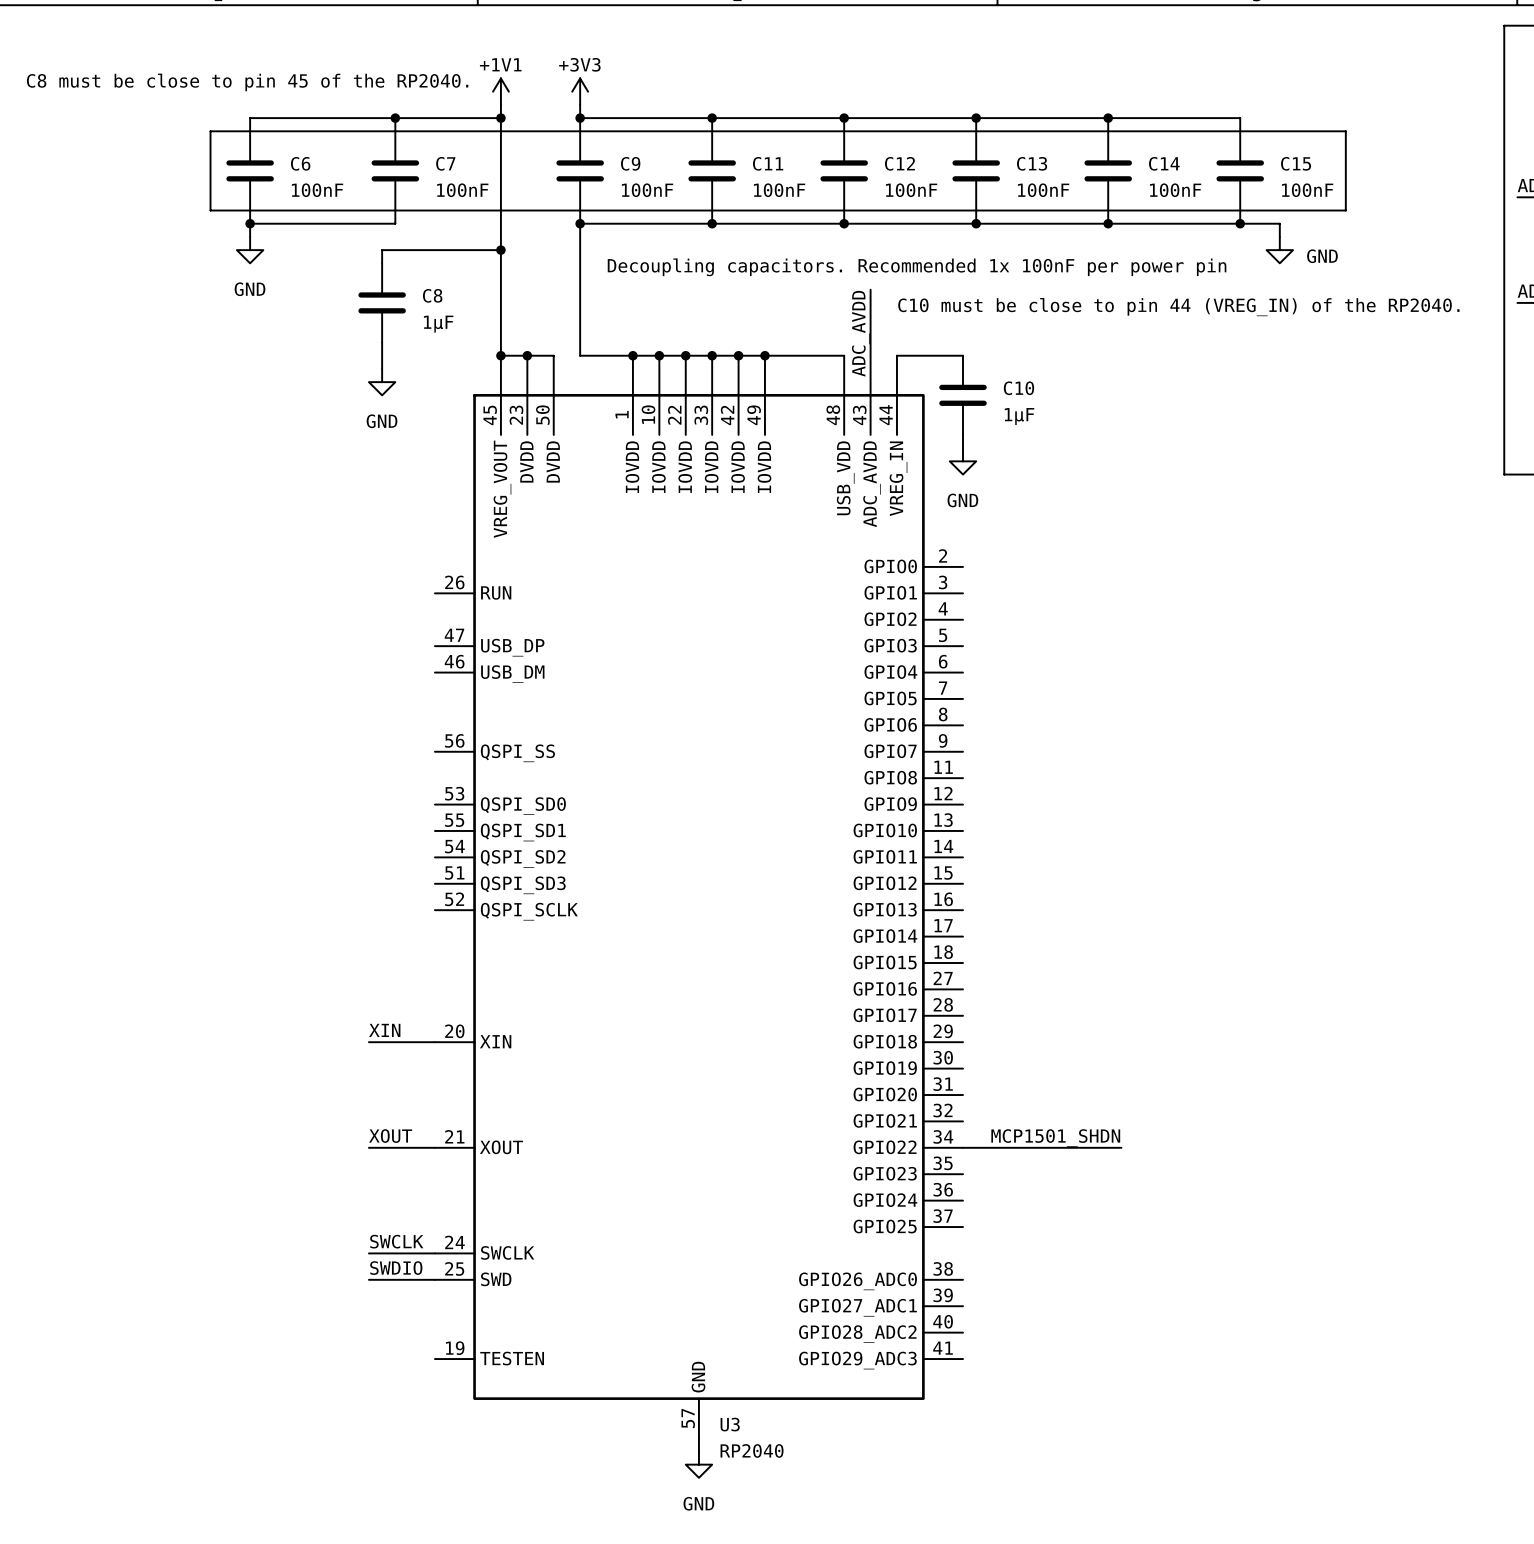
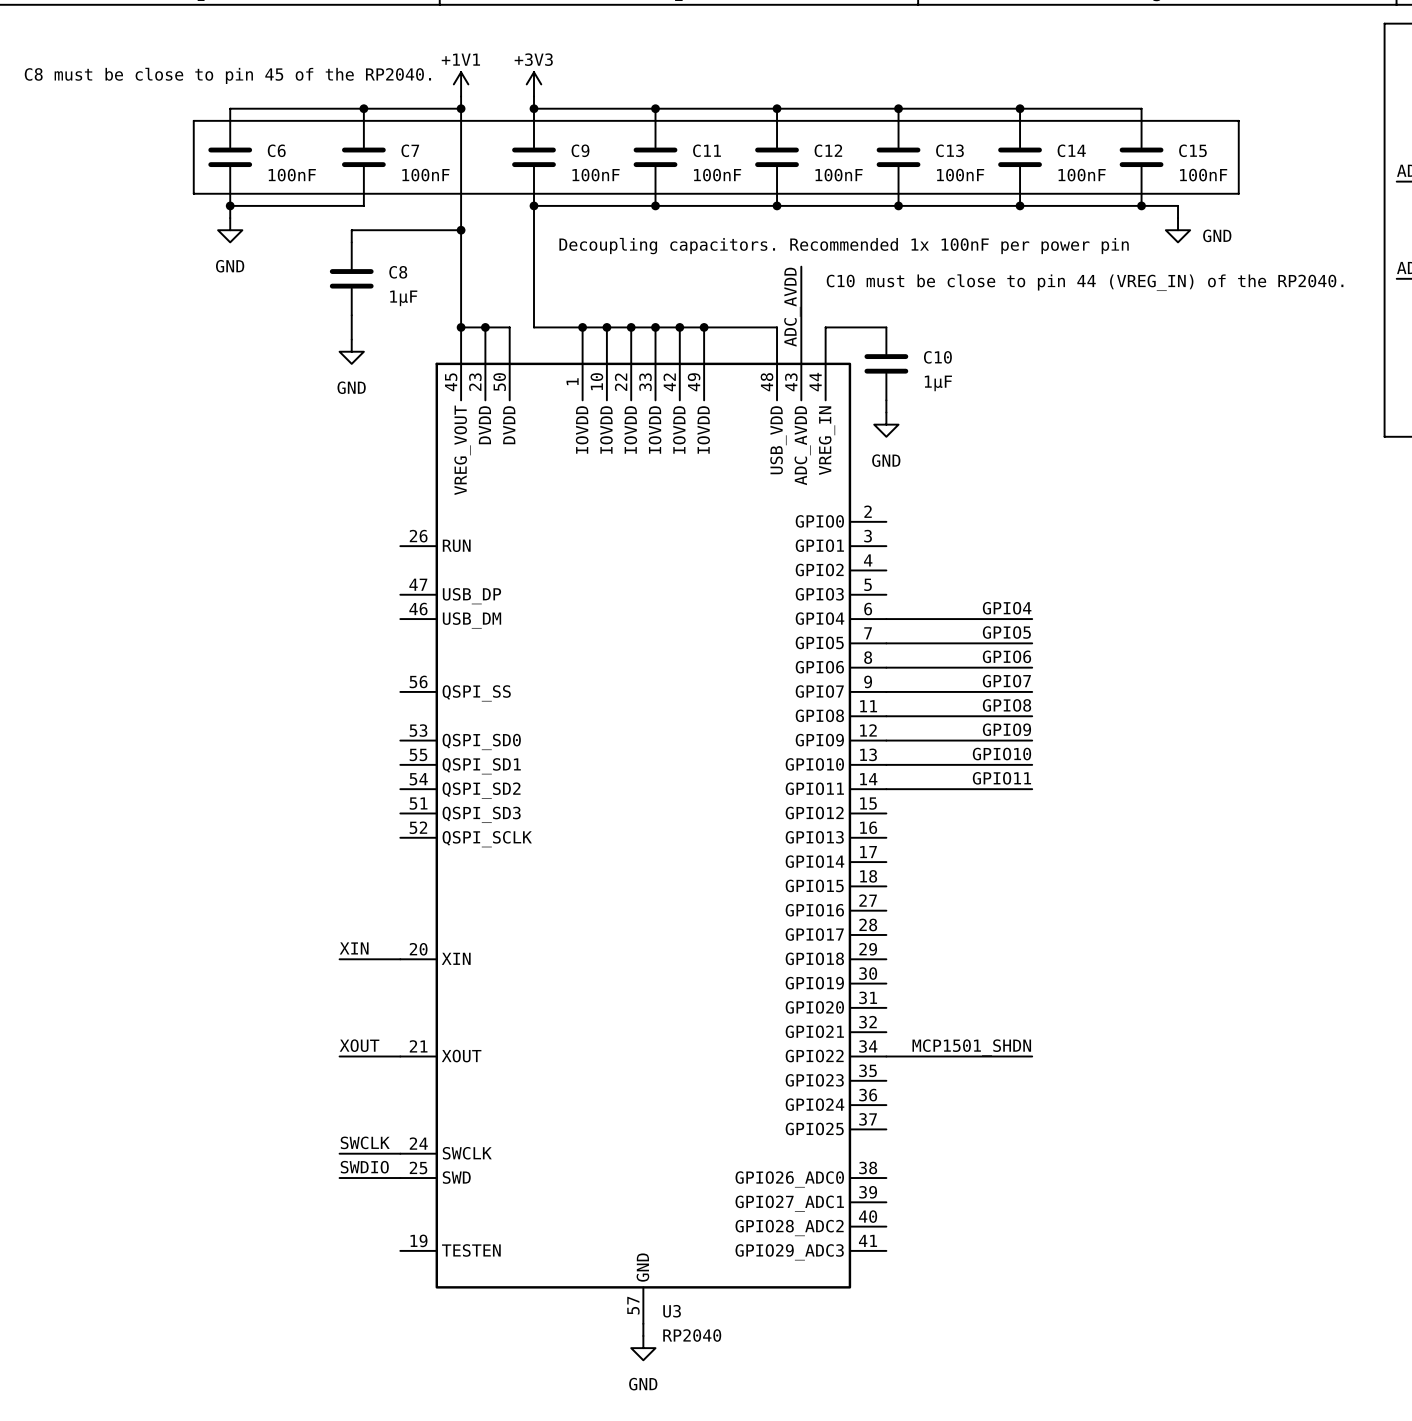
label: none -> GPIO4 (1007, 608)
wire: none -> (886, 619) (1032, 619)
label: none -> GPIO5 (1006, 632)
wire: none -> (886, 643) (1032, 643)
label: none -> GPIO6 (1006, 656)
wire: none -> (886, 667) (1032, 667)
label: none -> GPIO7 (1006, 681)
wire: none -> (886, 691) (1032, 691)
label: none -> GPIO8 (1006, 705)
wire: none -> (886, 716) (1032, 716)
label: none -> GPIO9 (1006, 729)
wire: none -> (886, 740) (1032, 740)
label: none -> GPIO10 (1001, 754)
wire: none -> (886, 764) (1032, 764)
label: none -> GPIO11 (1001, 778)
wire: none -> (886, 789) (1032, 789)

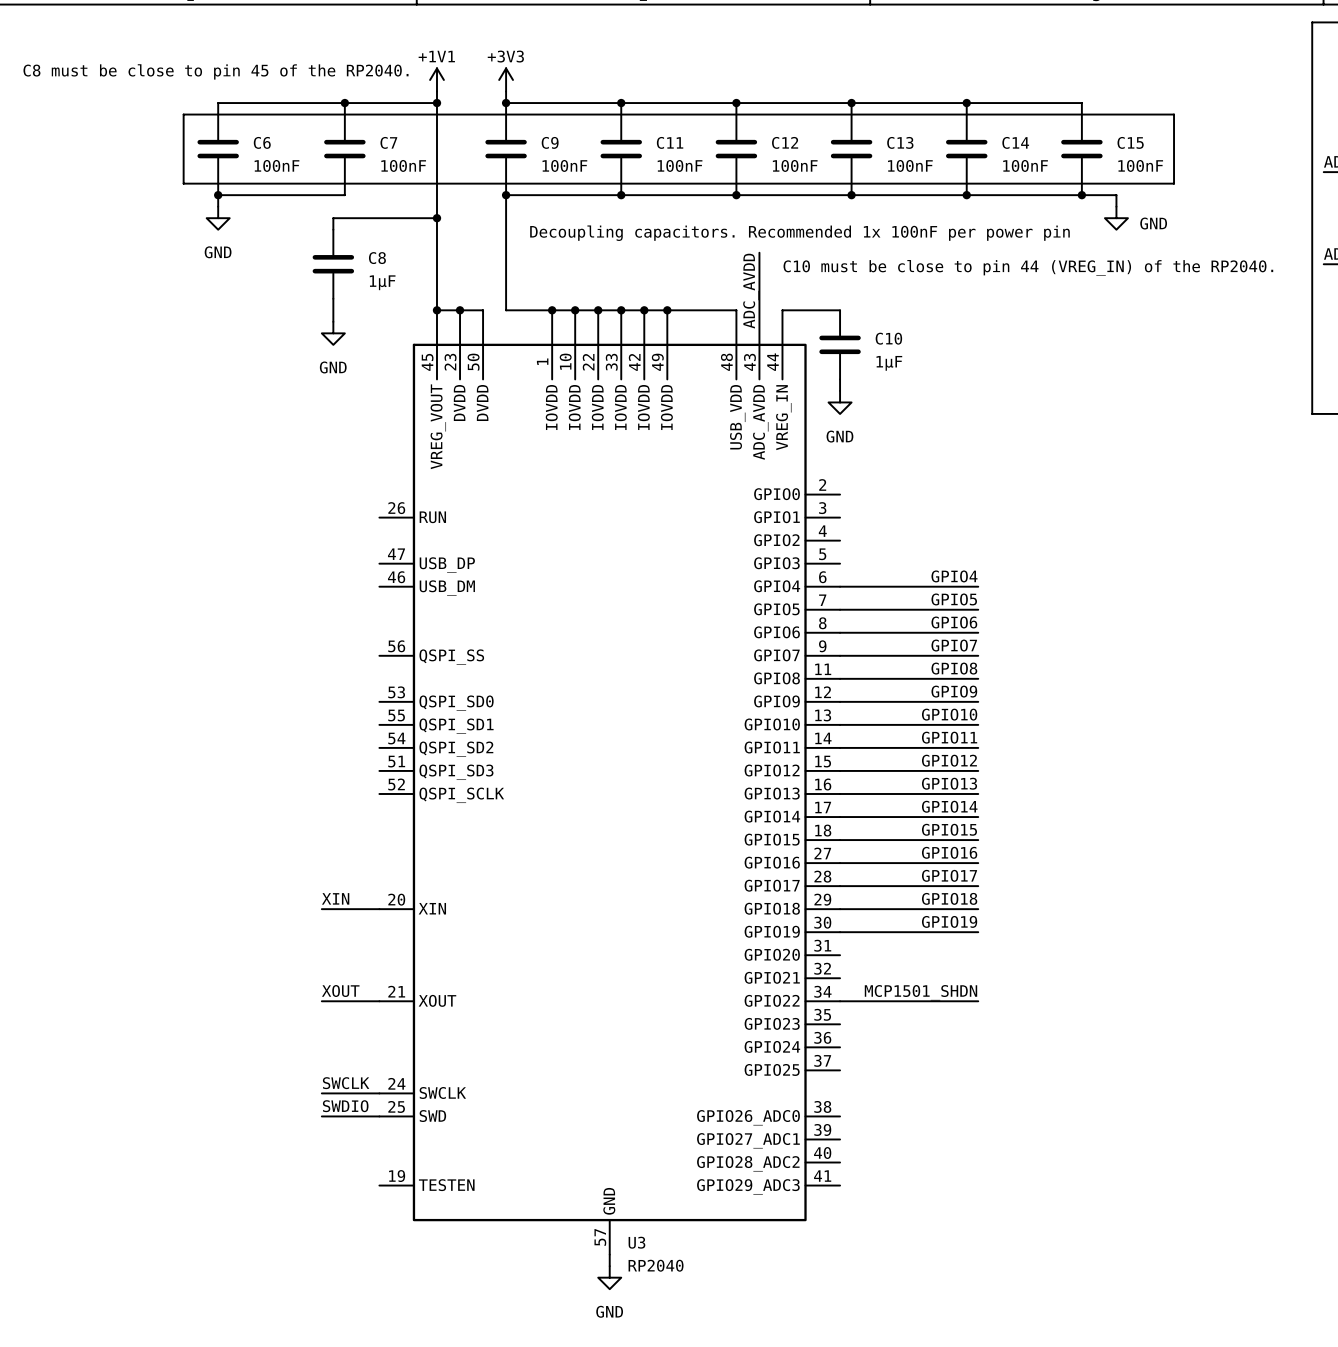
label: none -> GPIO12 (949, 760)
wire: none -> (840, 770) (978, 770)
label: none -> GPIO13 (949, 783)
wire: none -> (840, 793) (978, 793)
label: none -> GPIO14 (949, 806)
wire: none -> (840, 817) (978, 817)
label: none -> GPIO15 (949, 829)
wire: none -> (840, 840) (978, 840)
label: none -> GPIO16 (949, 852)
wire: none -> (840, 863) (978, 863)
label: none -> GPIO17 (949, 875)
wire: none -> (840, 886) (978, 886)
label: none -> GPIO18 (949, 898)
wire: none -> (840, 909) (978, 909)
label: none -> GPIO19 (949, 921)
wire: none -> (840, 932) (978, 932)

